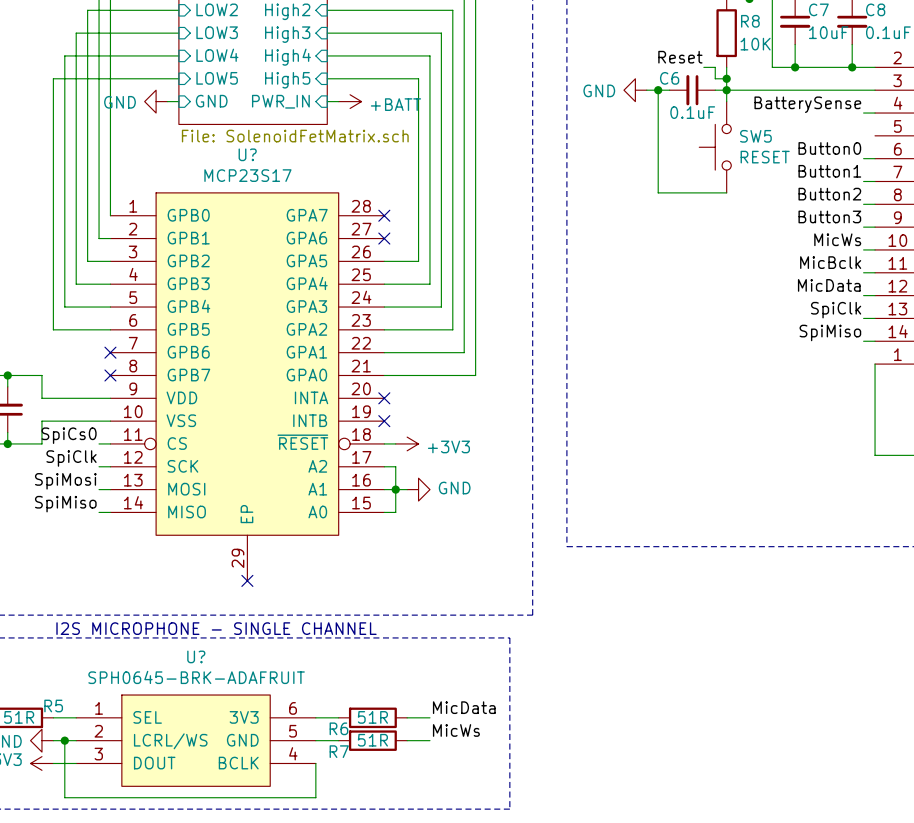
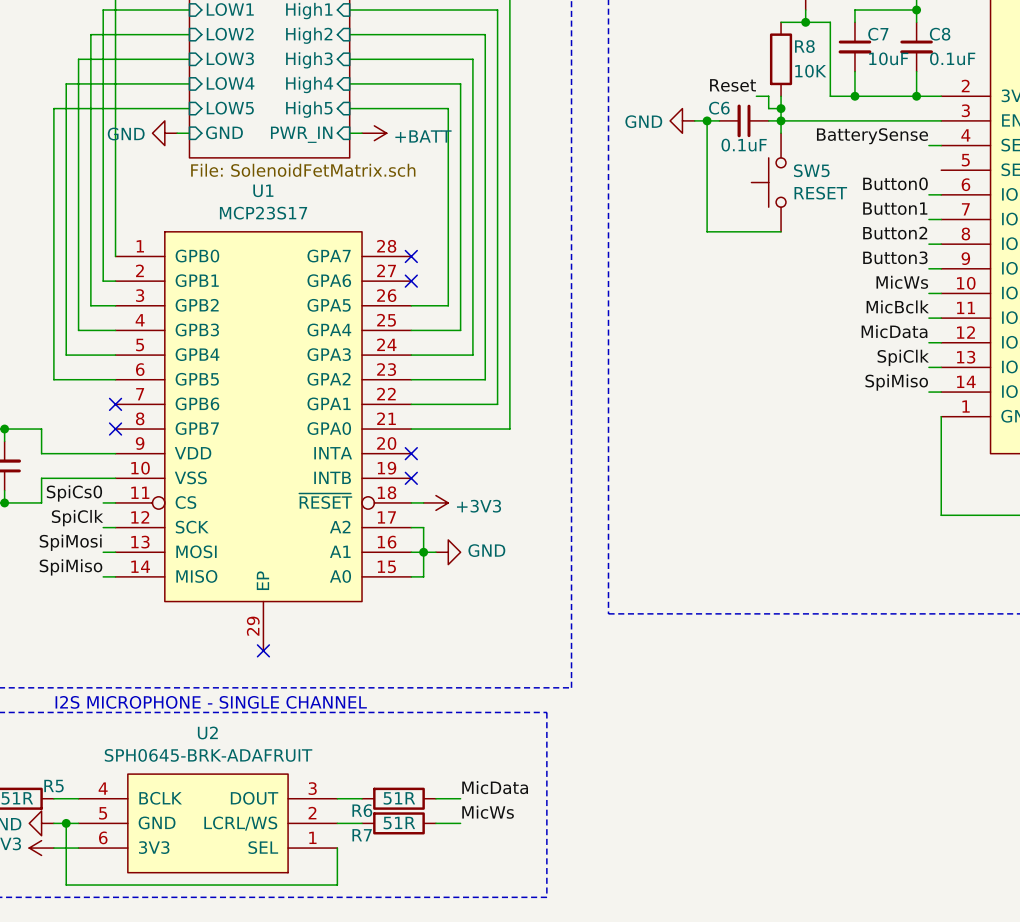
U? name: U? (247, 154) -> U1 (263, 190)
U? name: U? (196, 656) -> U2 (207, 732)
U? rotation: 0° (196, 740) -> 180° (207, 823)

